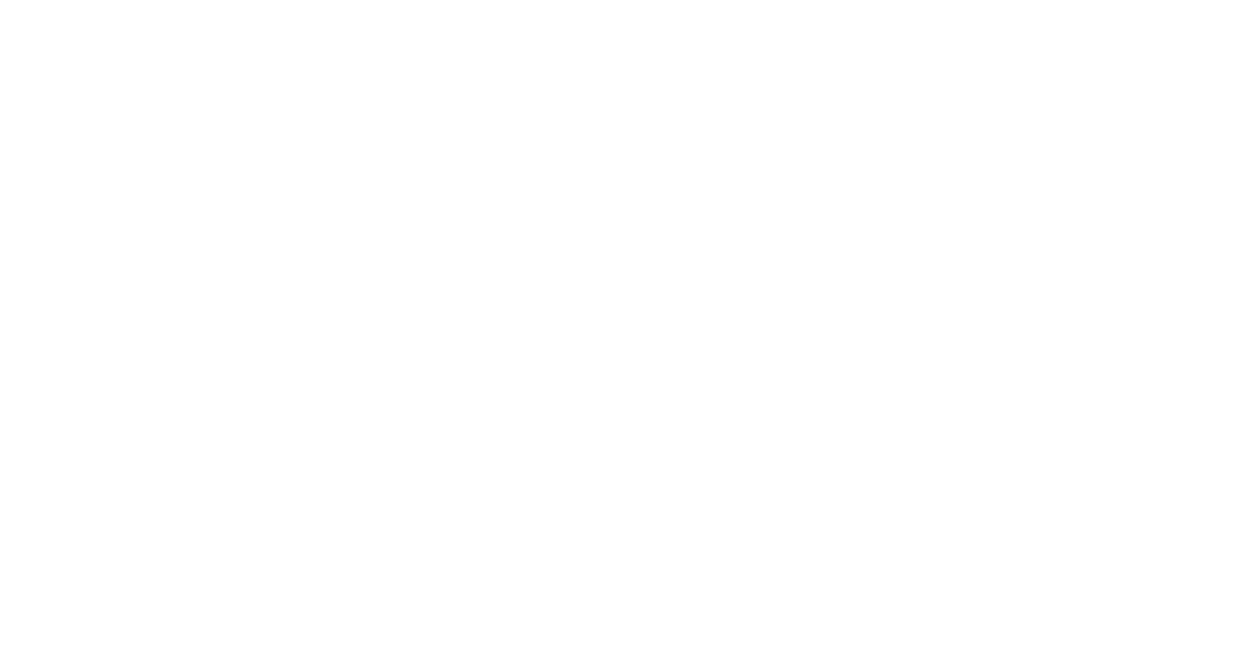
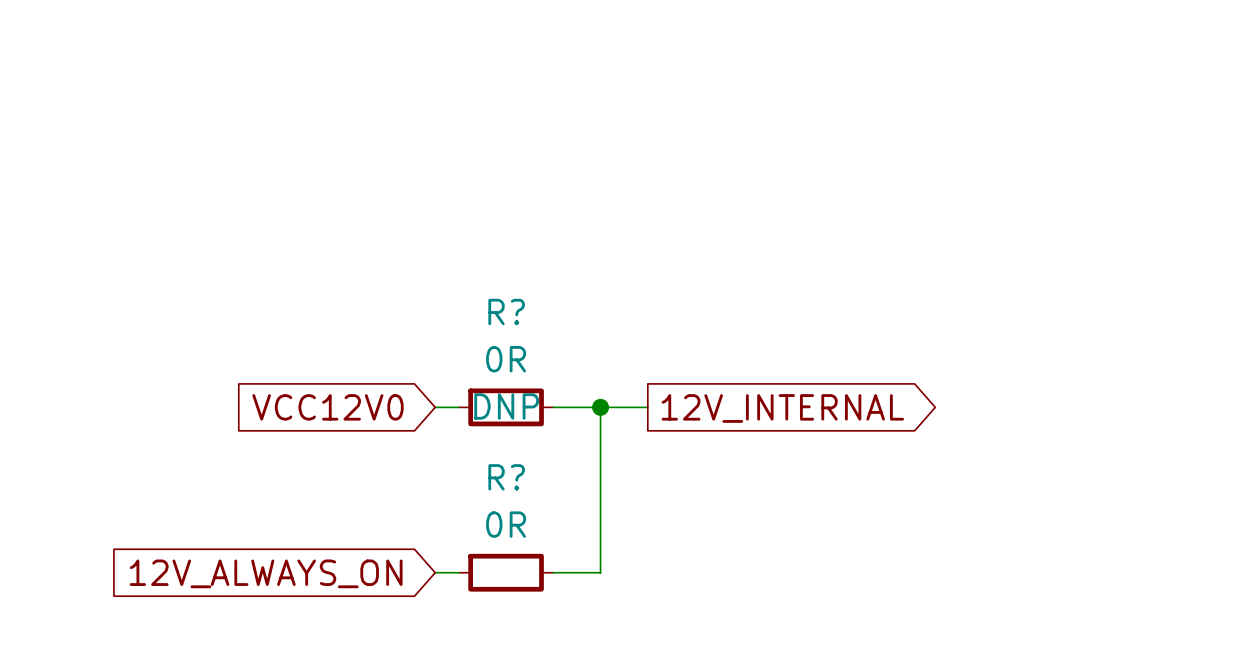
global label: none -> VCC12V0 (328, 407)
wire: none -> (435, 407) (458, 407)
R?: none -> (506, 407)
wire: none -> (553, 407) (647, 407)
wire: none -> (600, 407) (600, 572) (553, 572)
junction: none -> (600, 407)
global label: none -> 12V_INTERNAL (782, 408)
wire: none -> (435, 572) (458, 572)
R?: none -> (506, 572)
global label: none -> 12V_ALWAYS_ON (266, 573)

